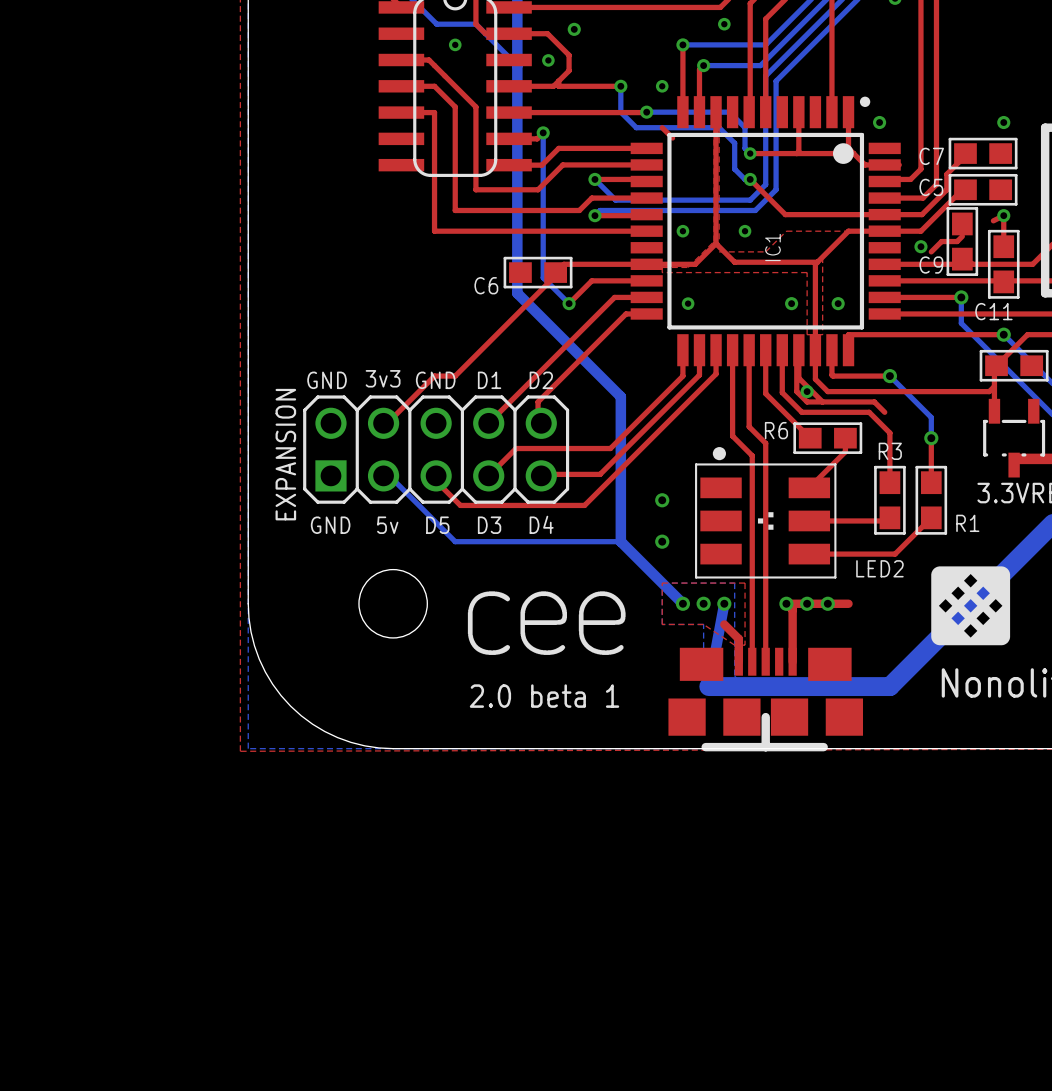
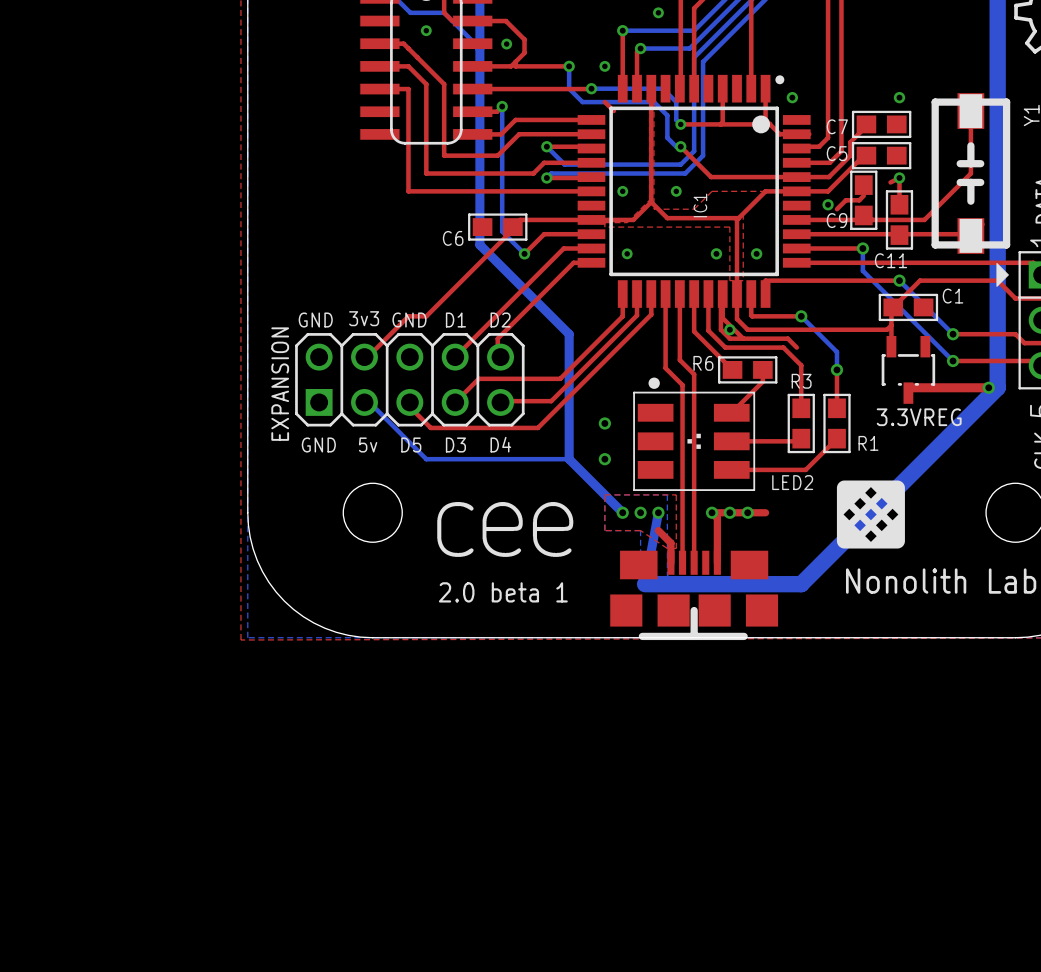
via: (574, 29) -> none

